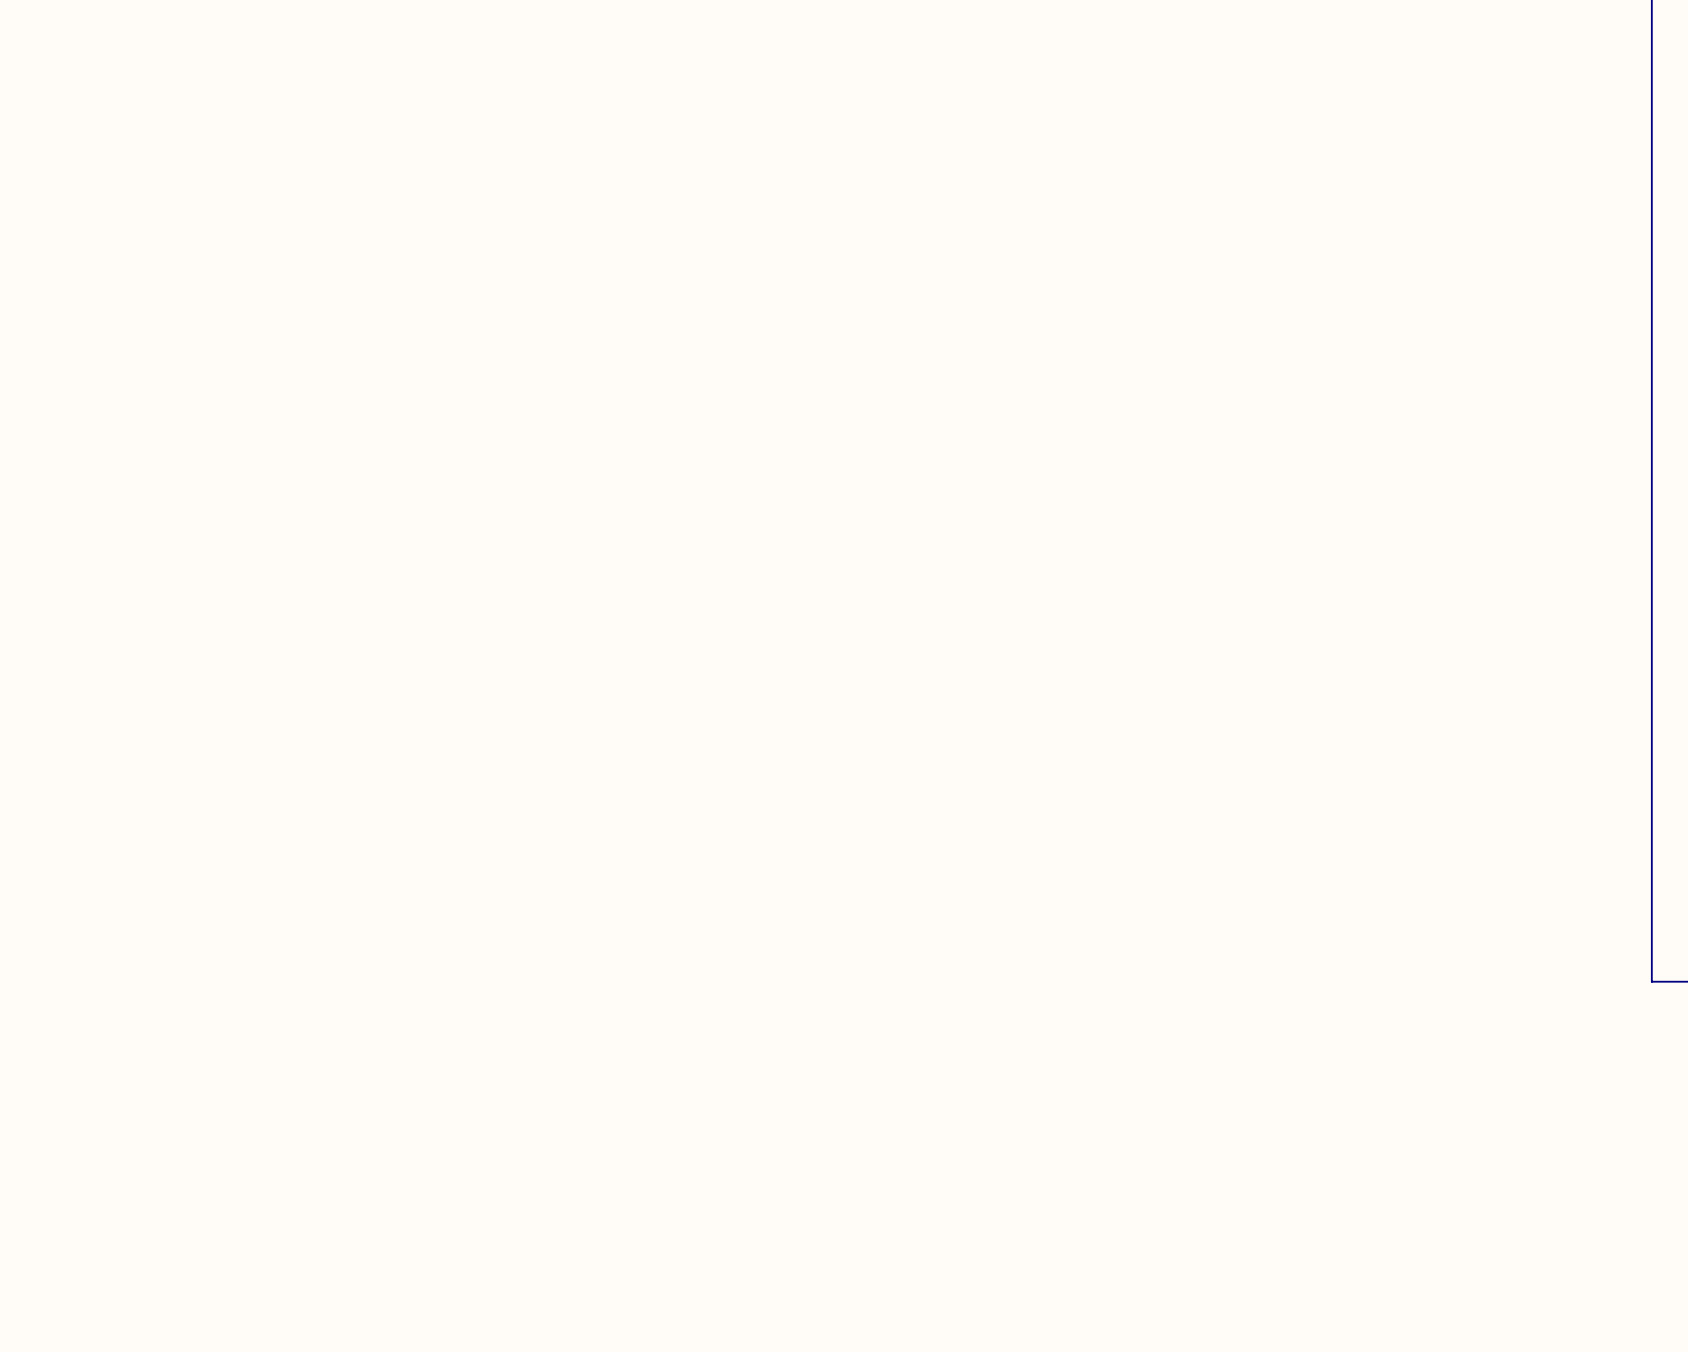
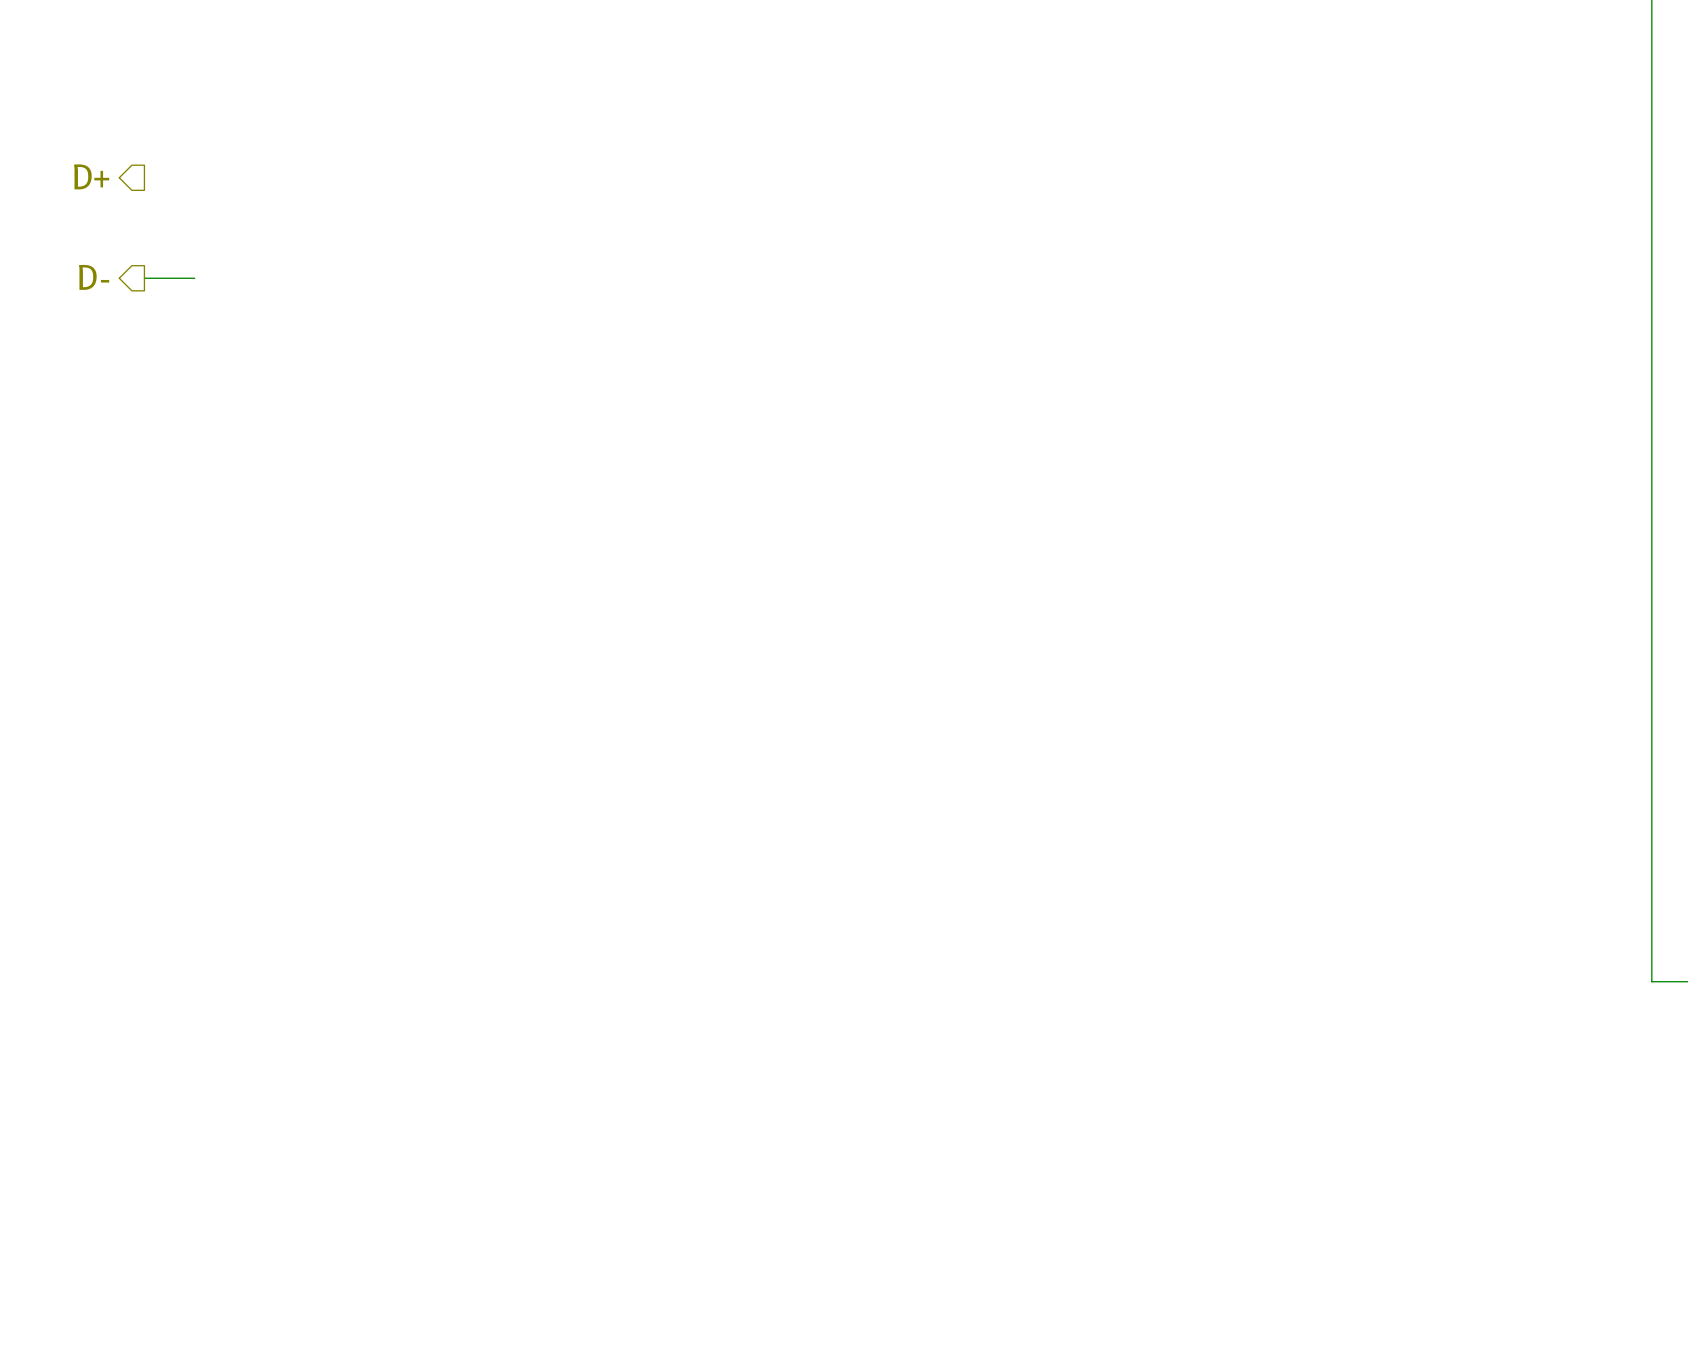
hierarchical label: none -> D+ (91, 176)
hierarchical label: none -> D- (94, 277)
wire: none -> (144, 278) (194, 278)

